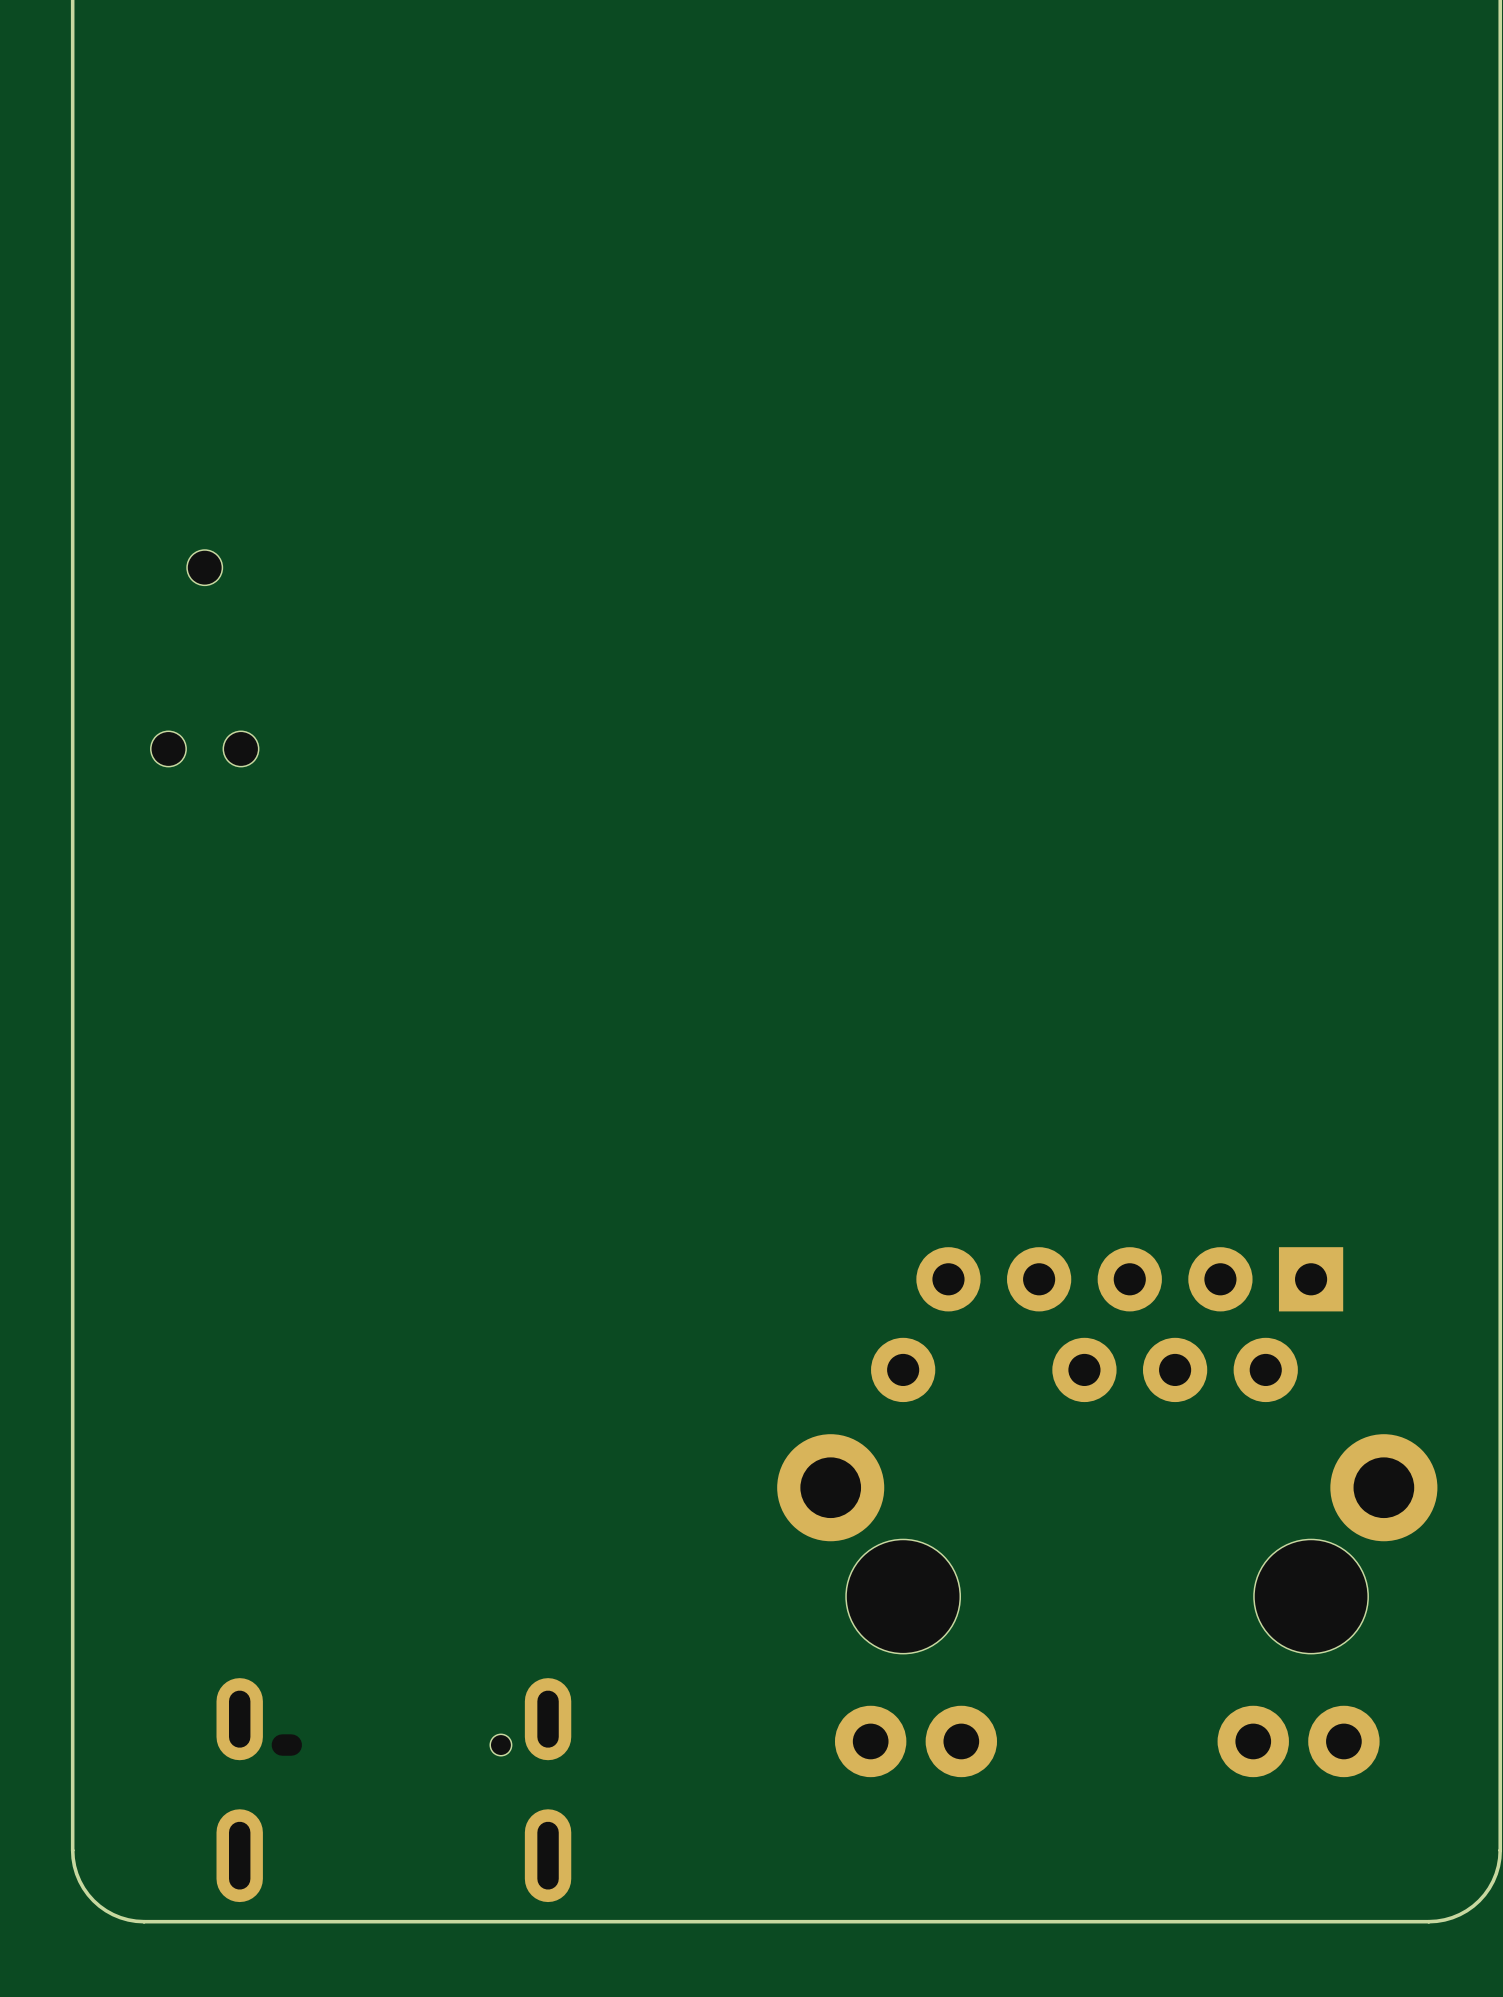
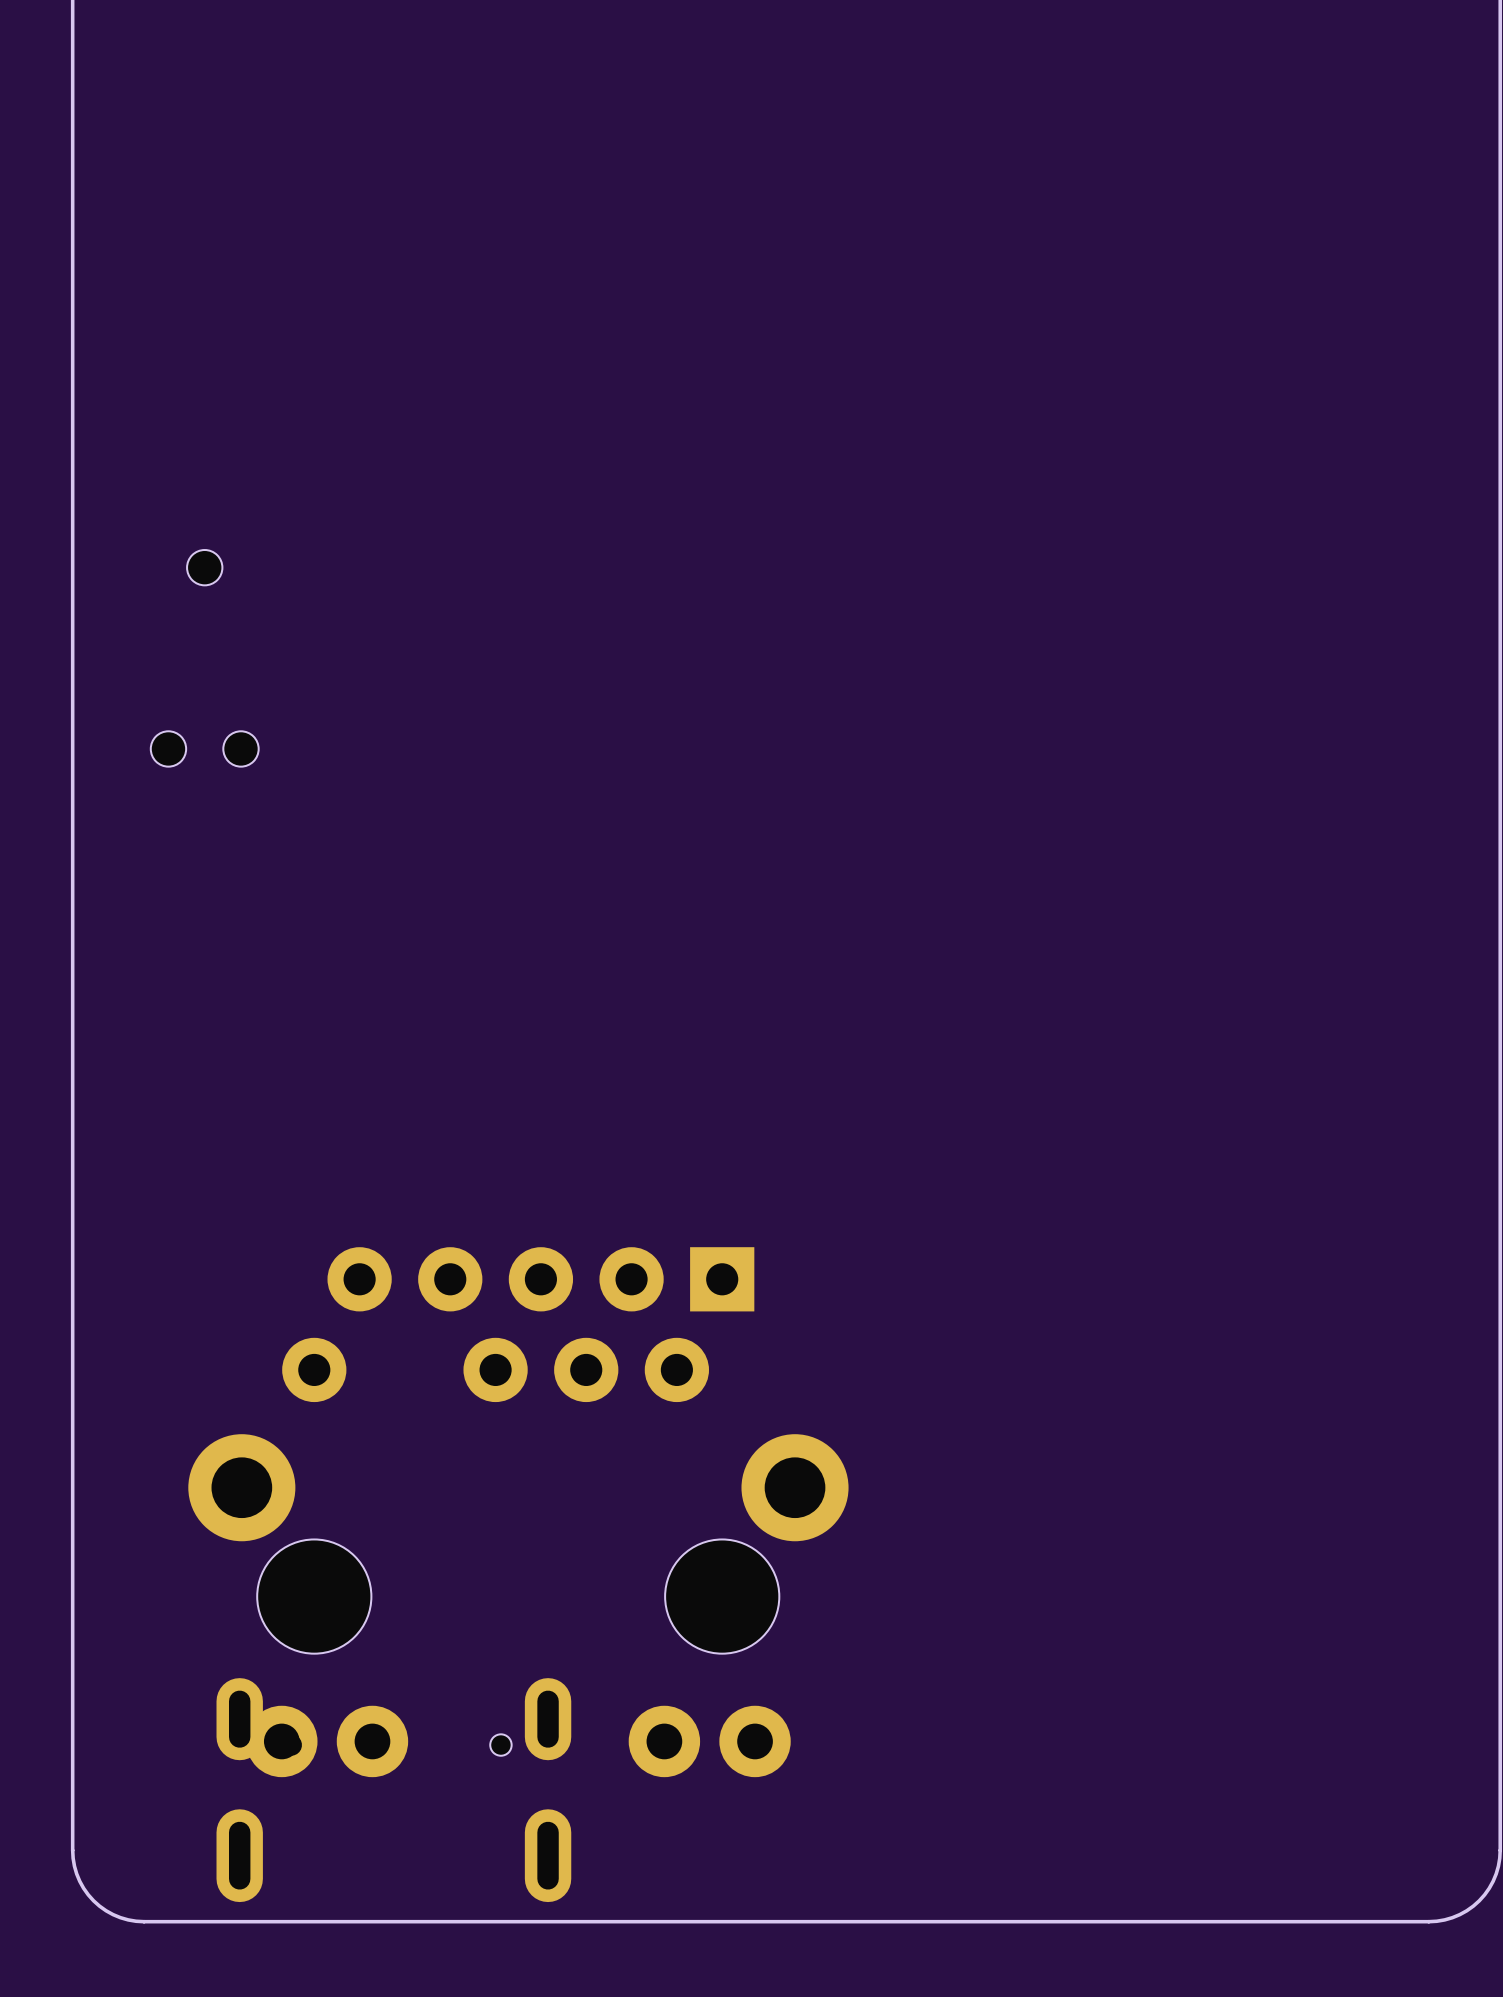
part position: (1107, 1512) -> (518, 1512)

